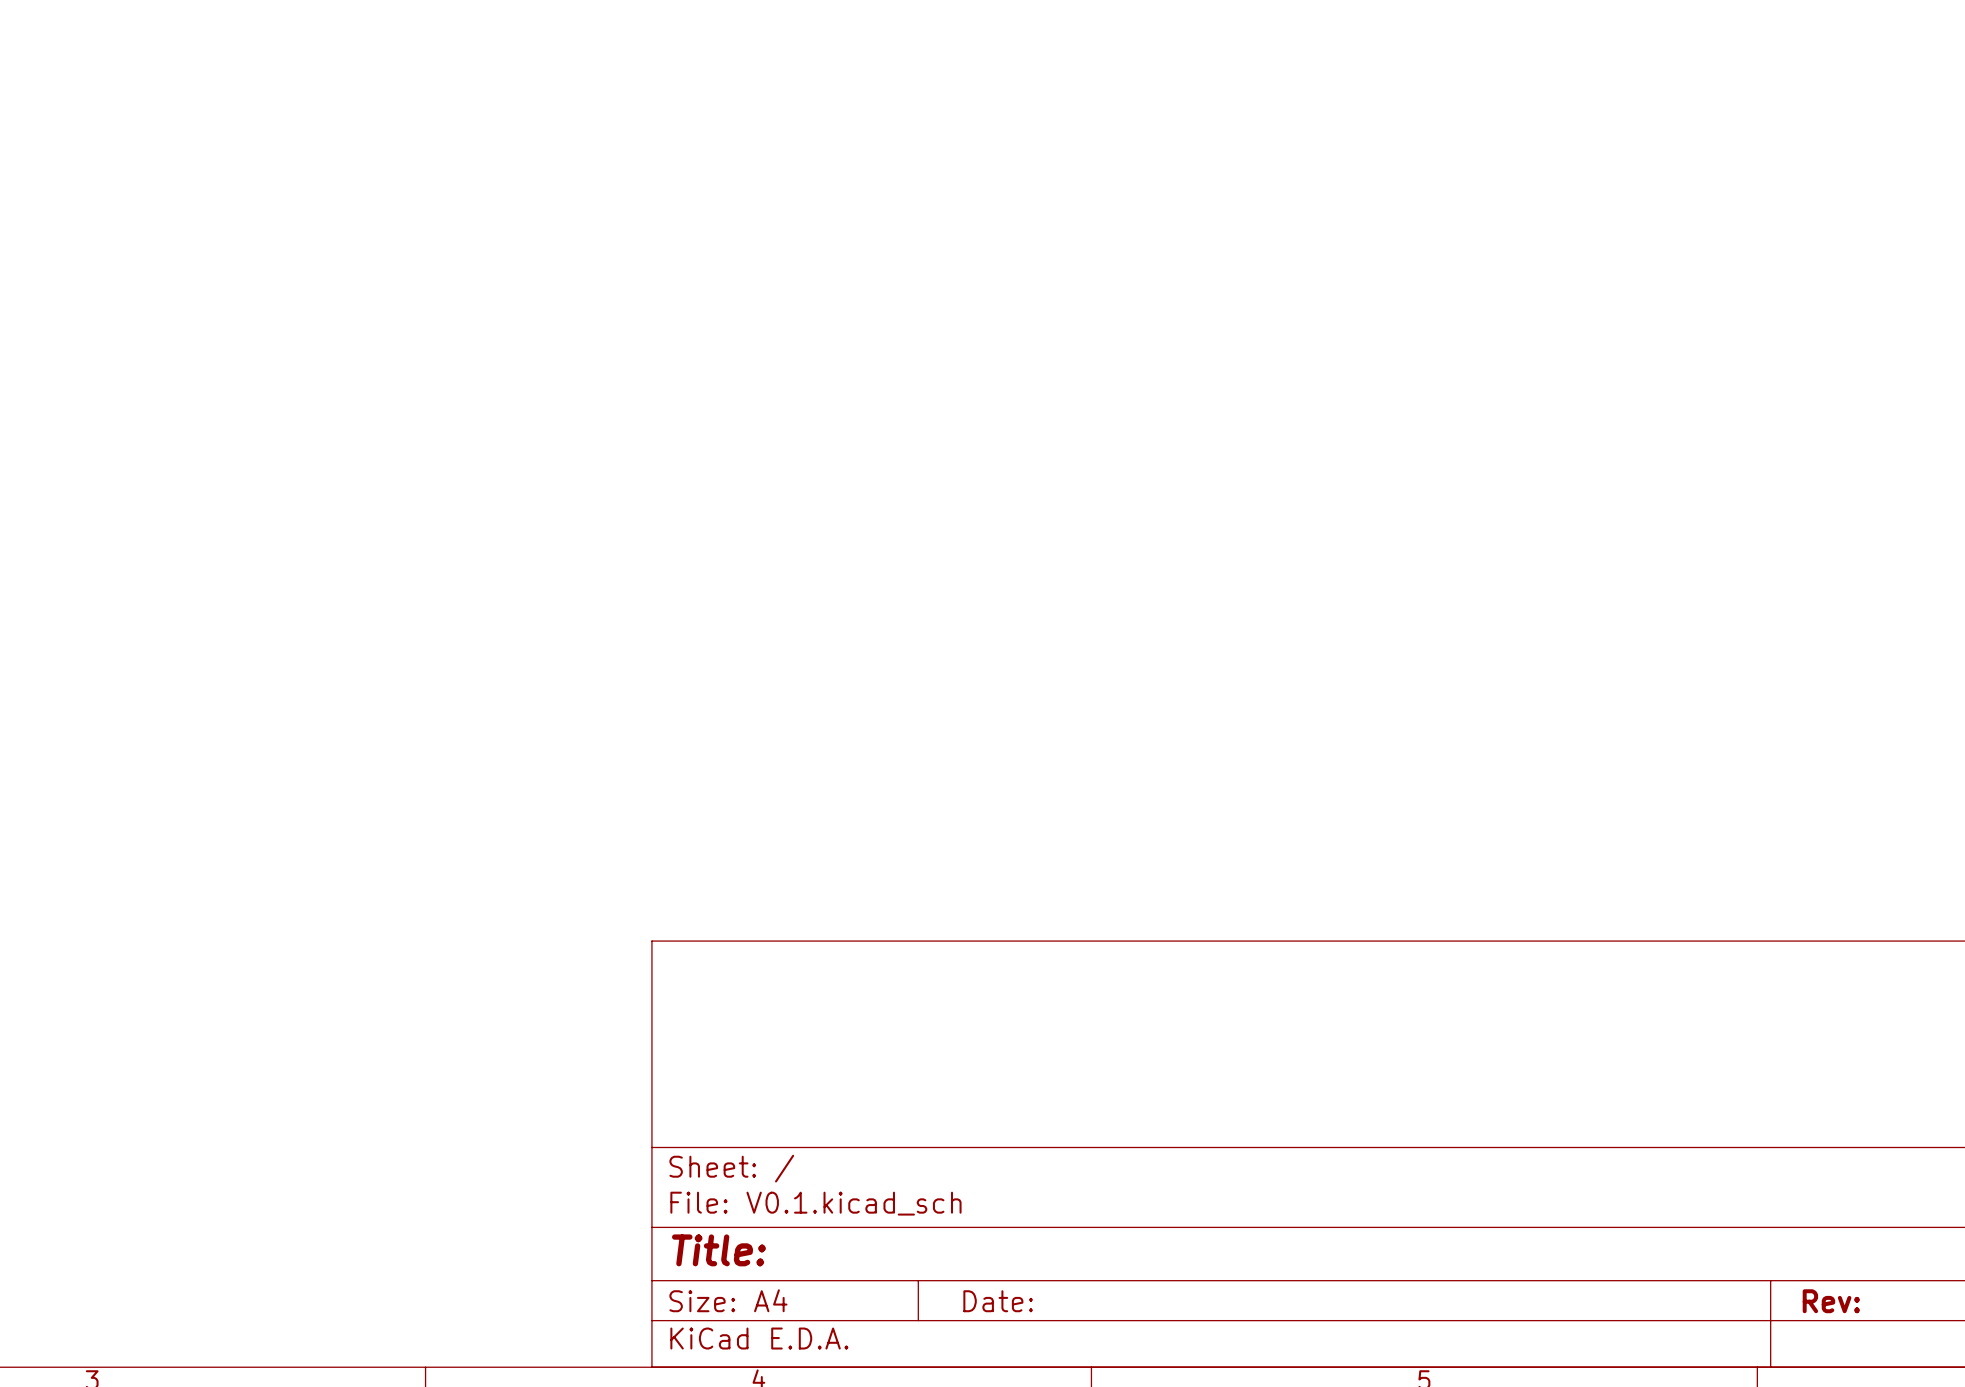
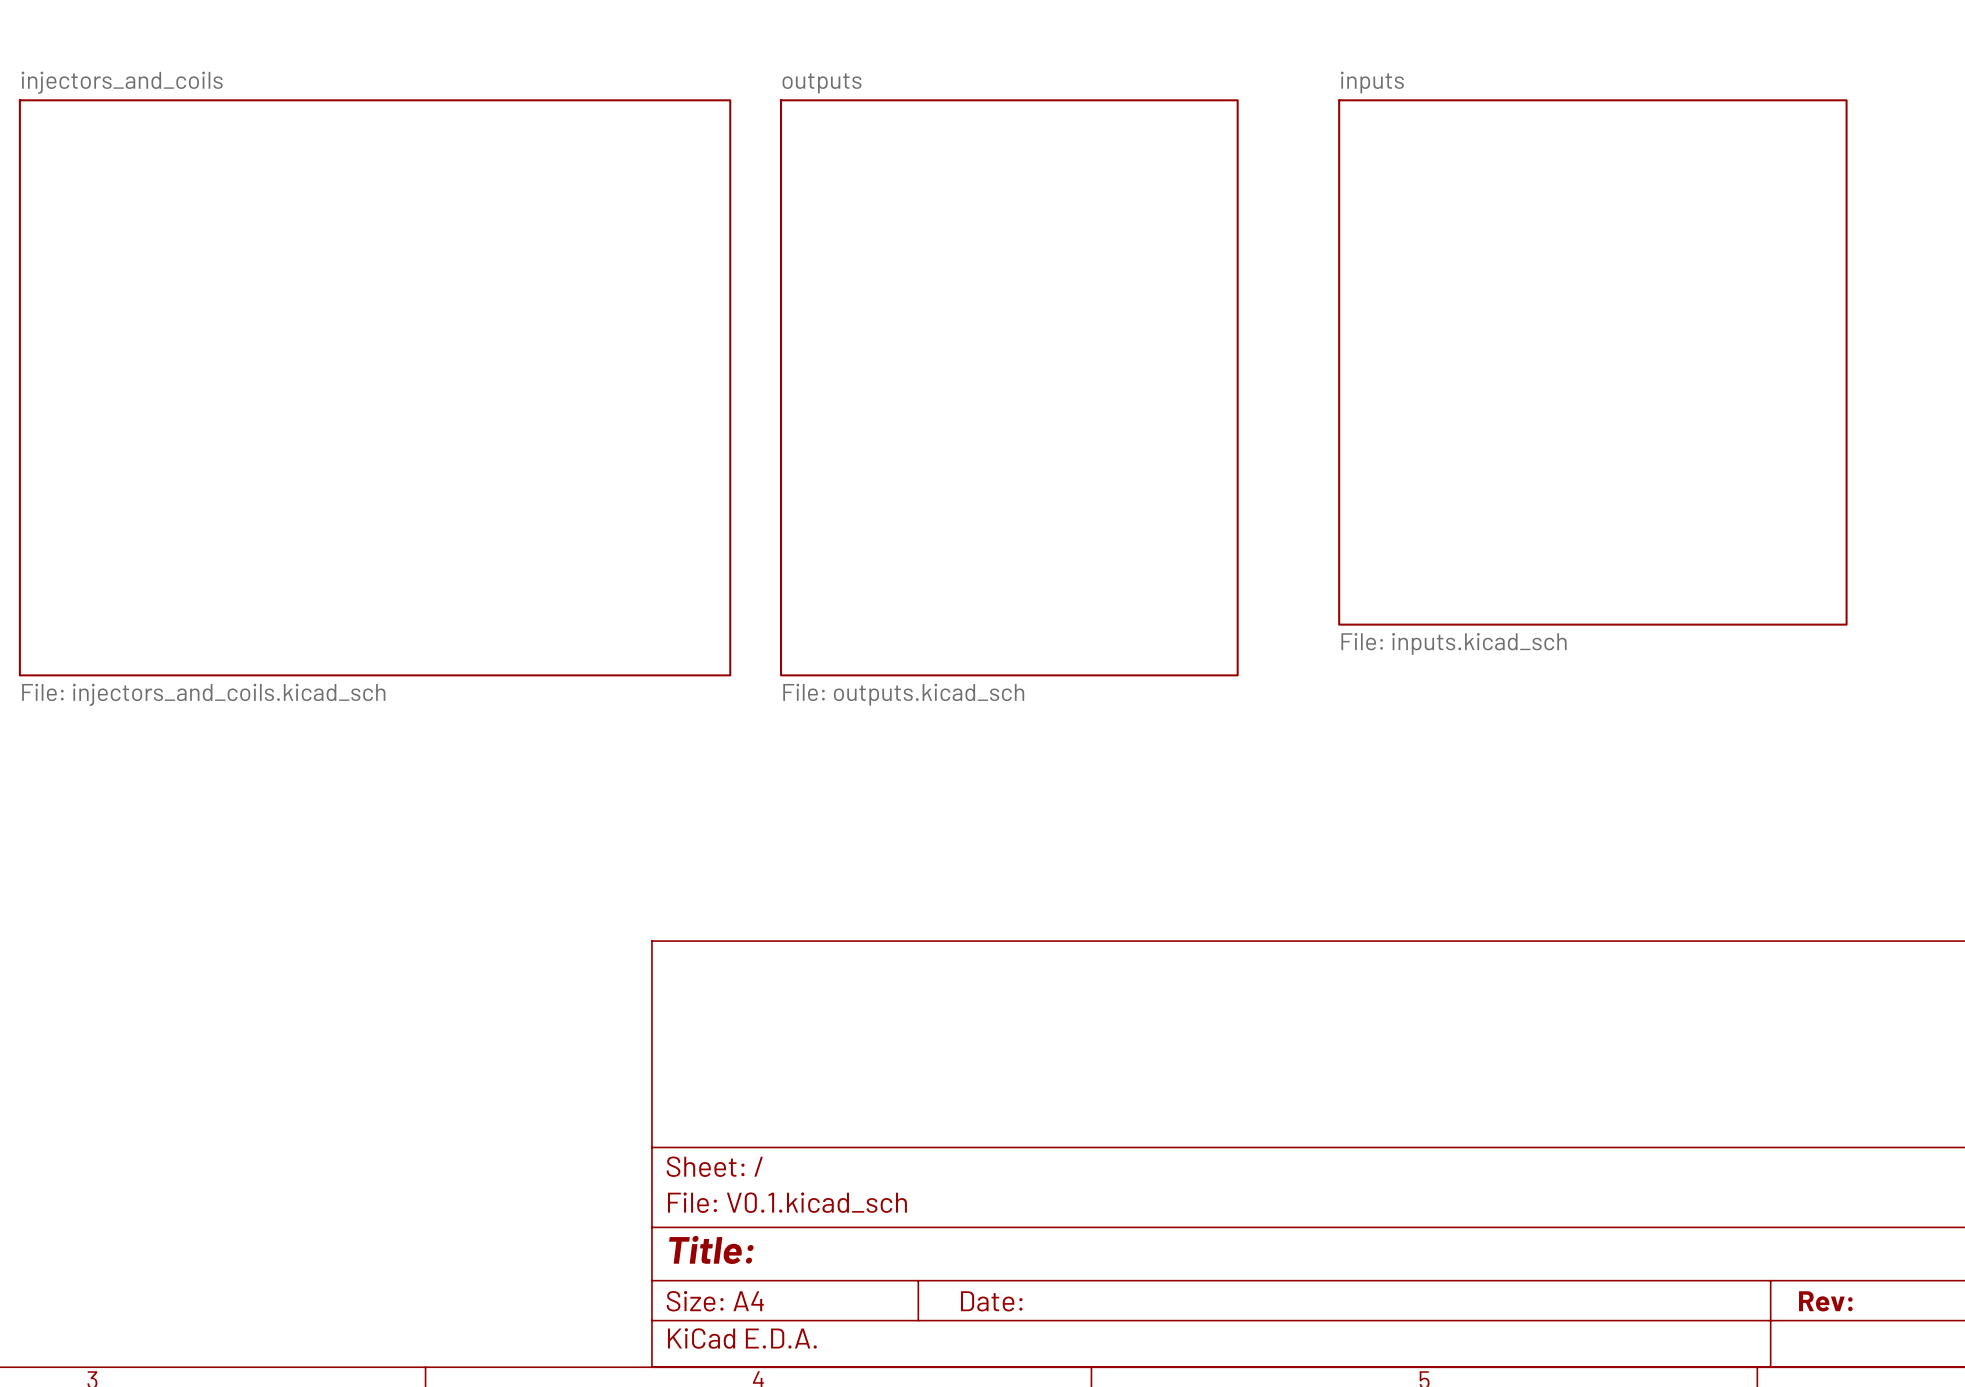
sheet inputs: none -> File: inputs.kicad_sch (1592, 362)
sheet injectors_and_coils: none -> File: injectors_and_coils.kicad_sch (375, 387)
sheet outputs: none -> File: outputs.kicad_sch (1009, 387)

